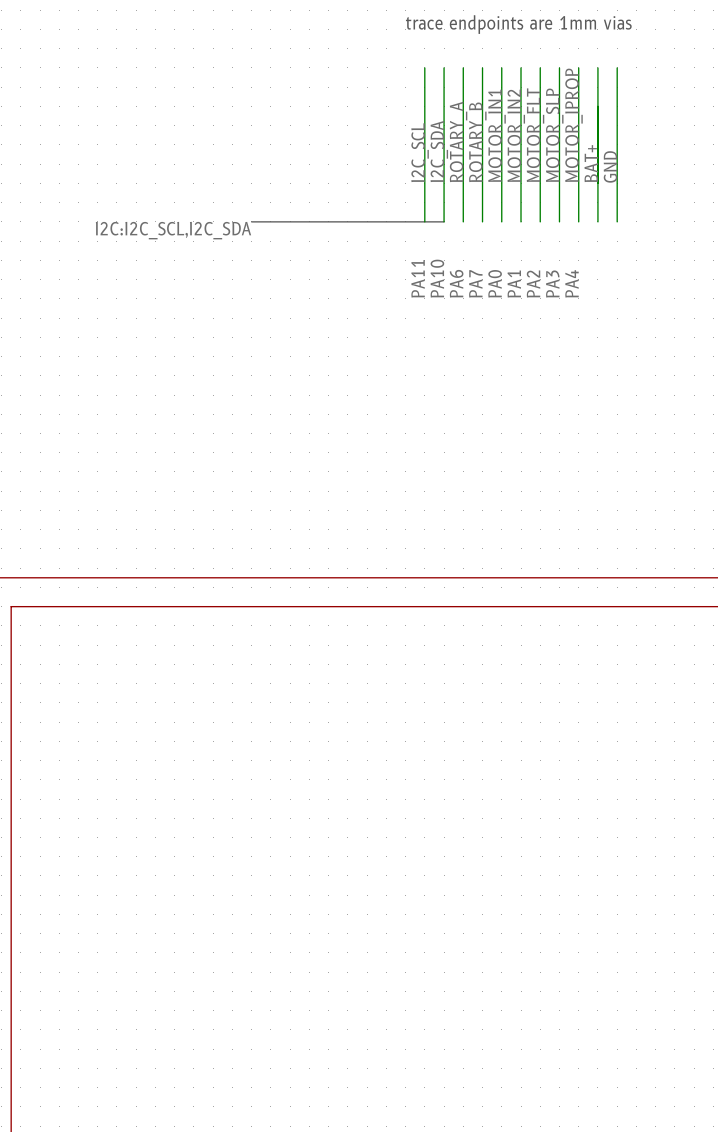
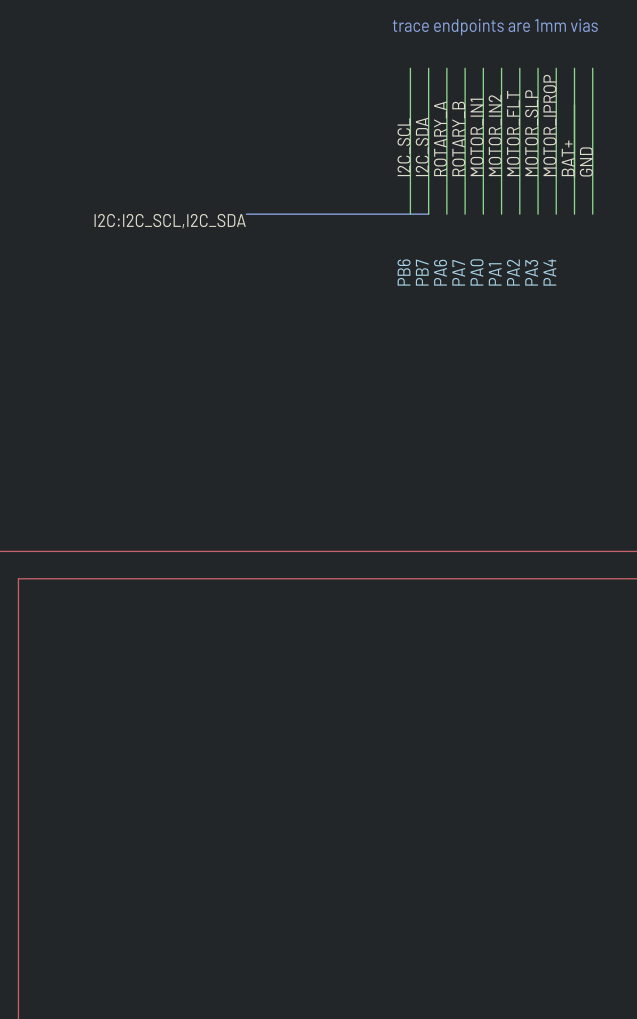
text: PA11 (418, 278) -> PB6 (404, 272)
text: PA10 (437, 278) -> PB7 (422, 272)

